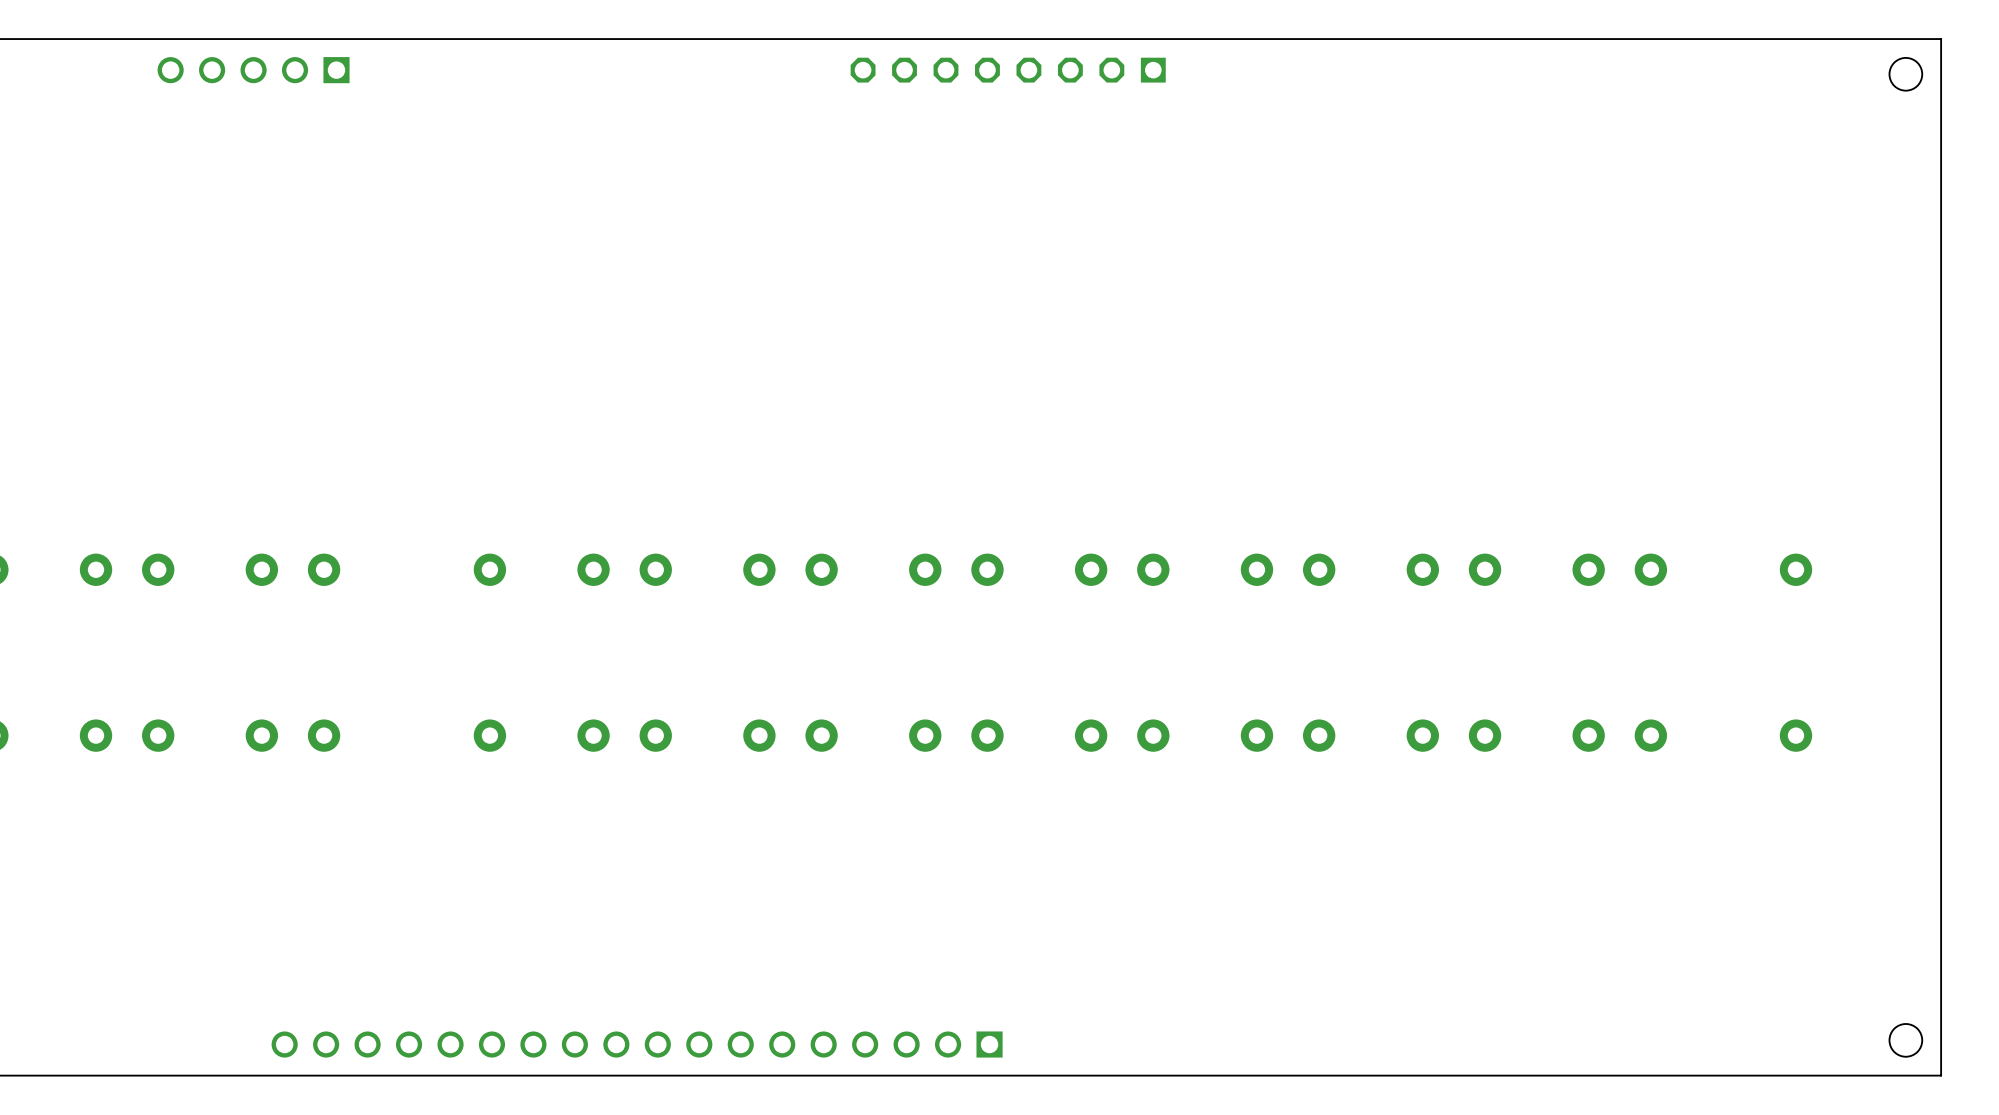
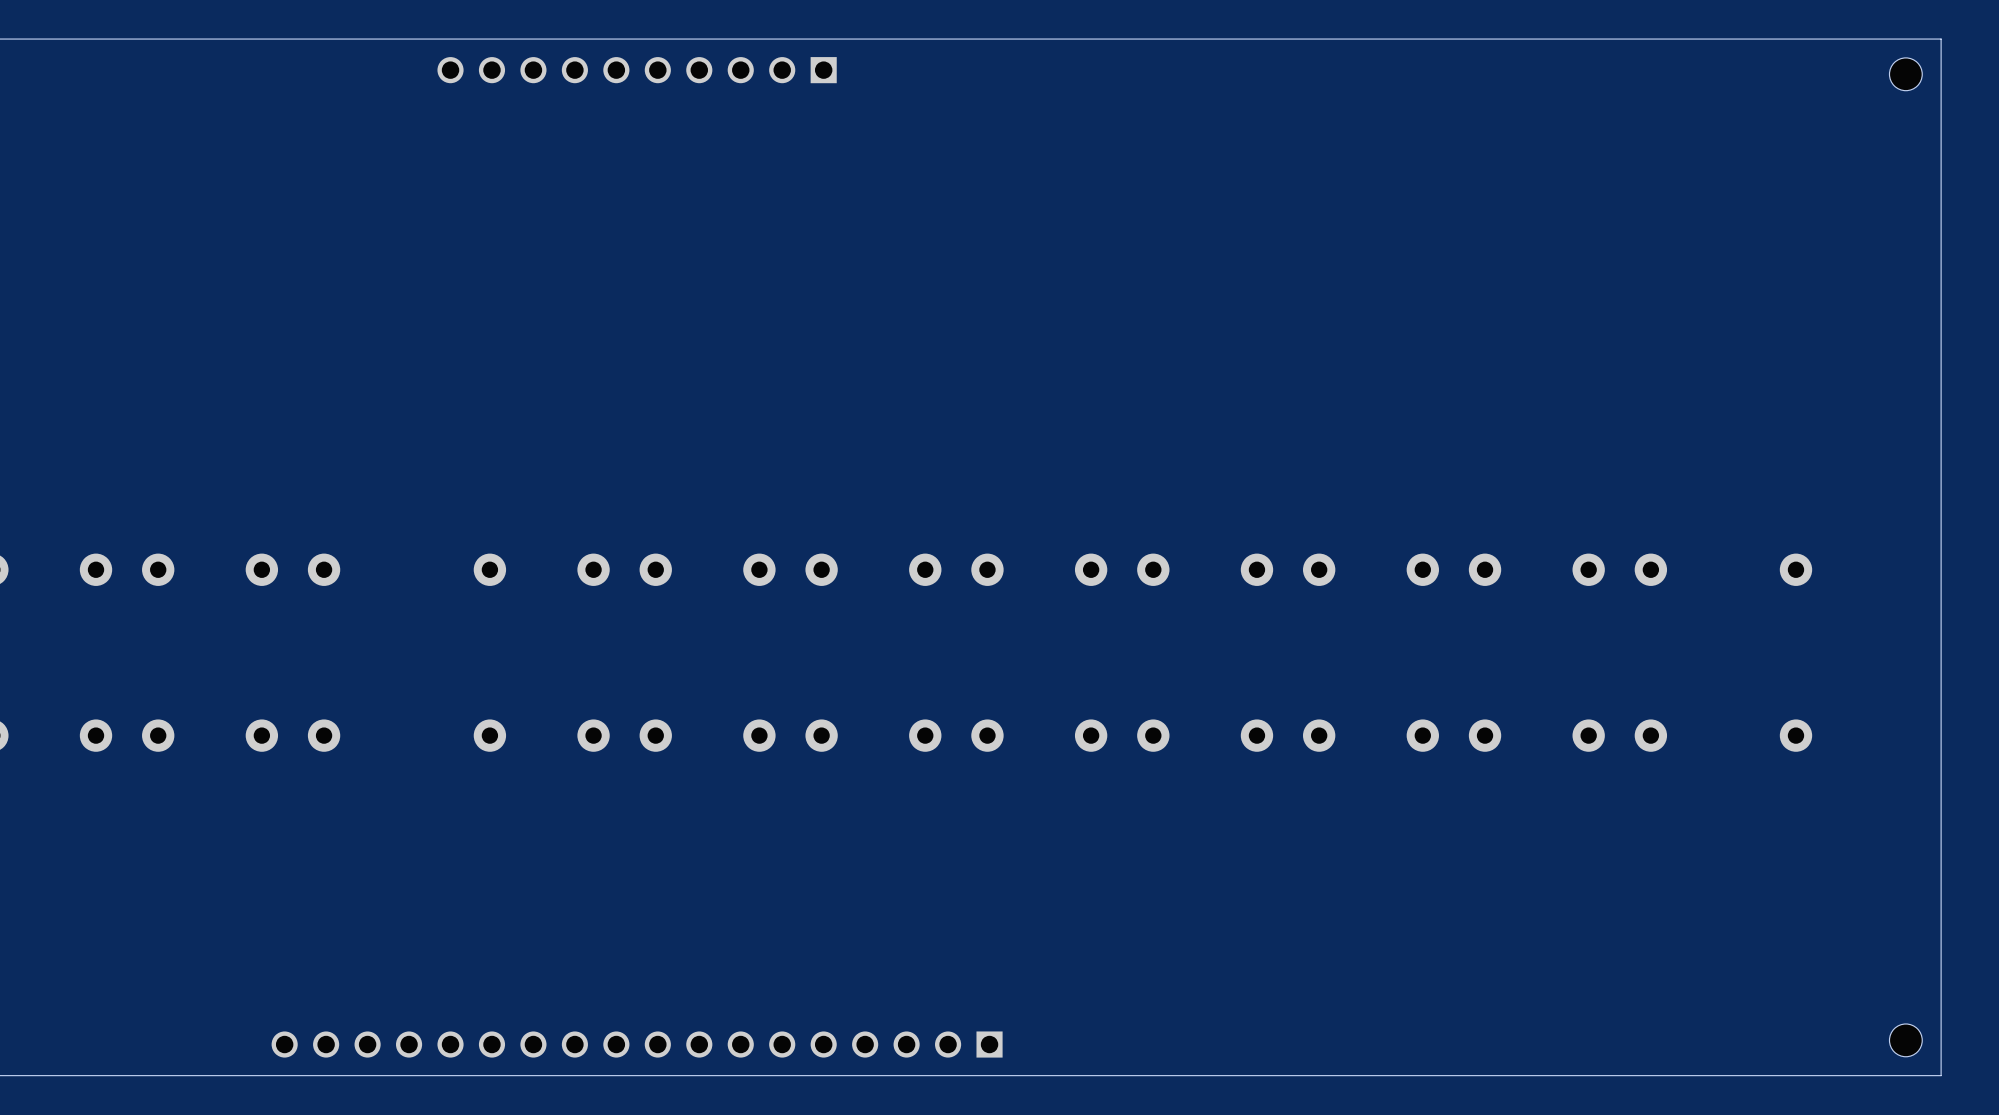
part: (253, 70) -> none
part: none -> (637, 70)
part: (1008, 70) -> none

